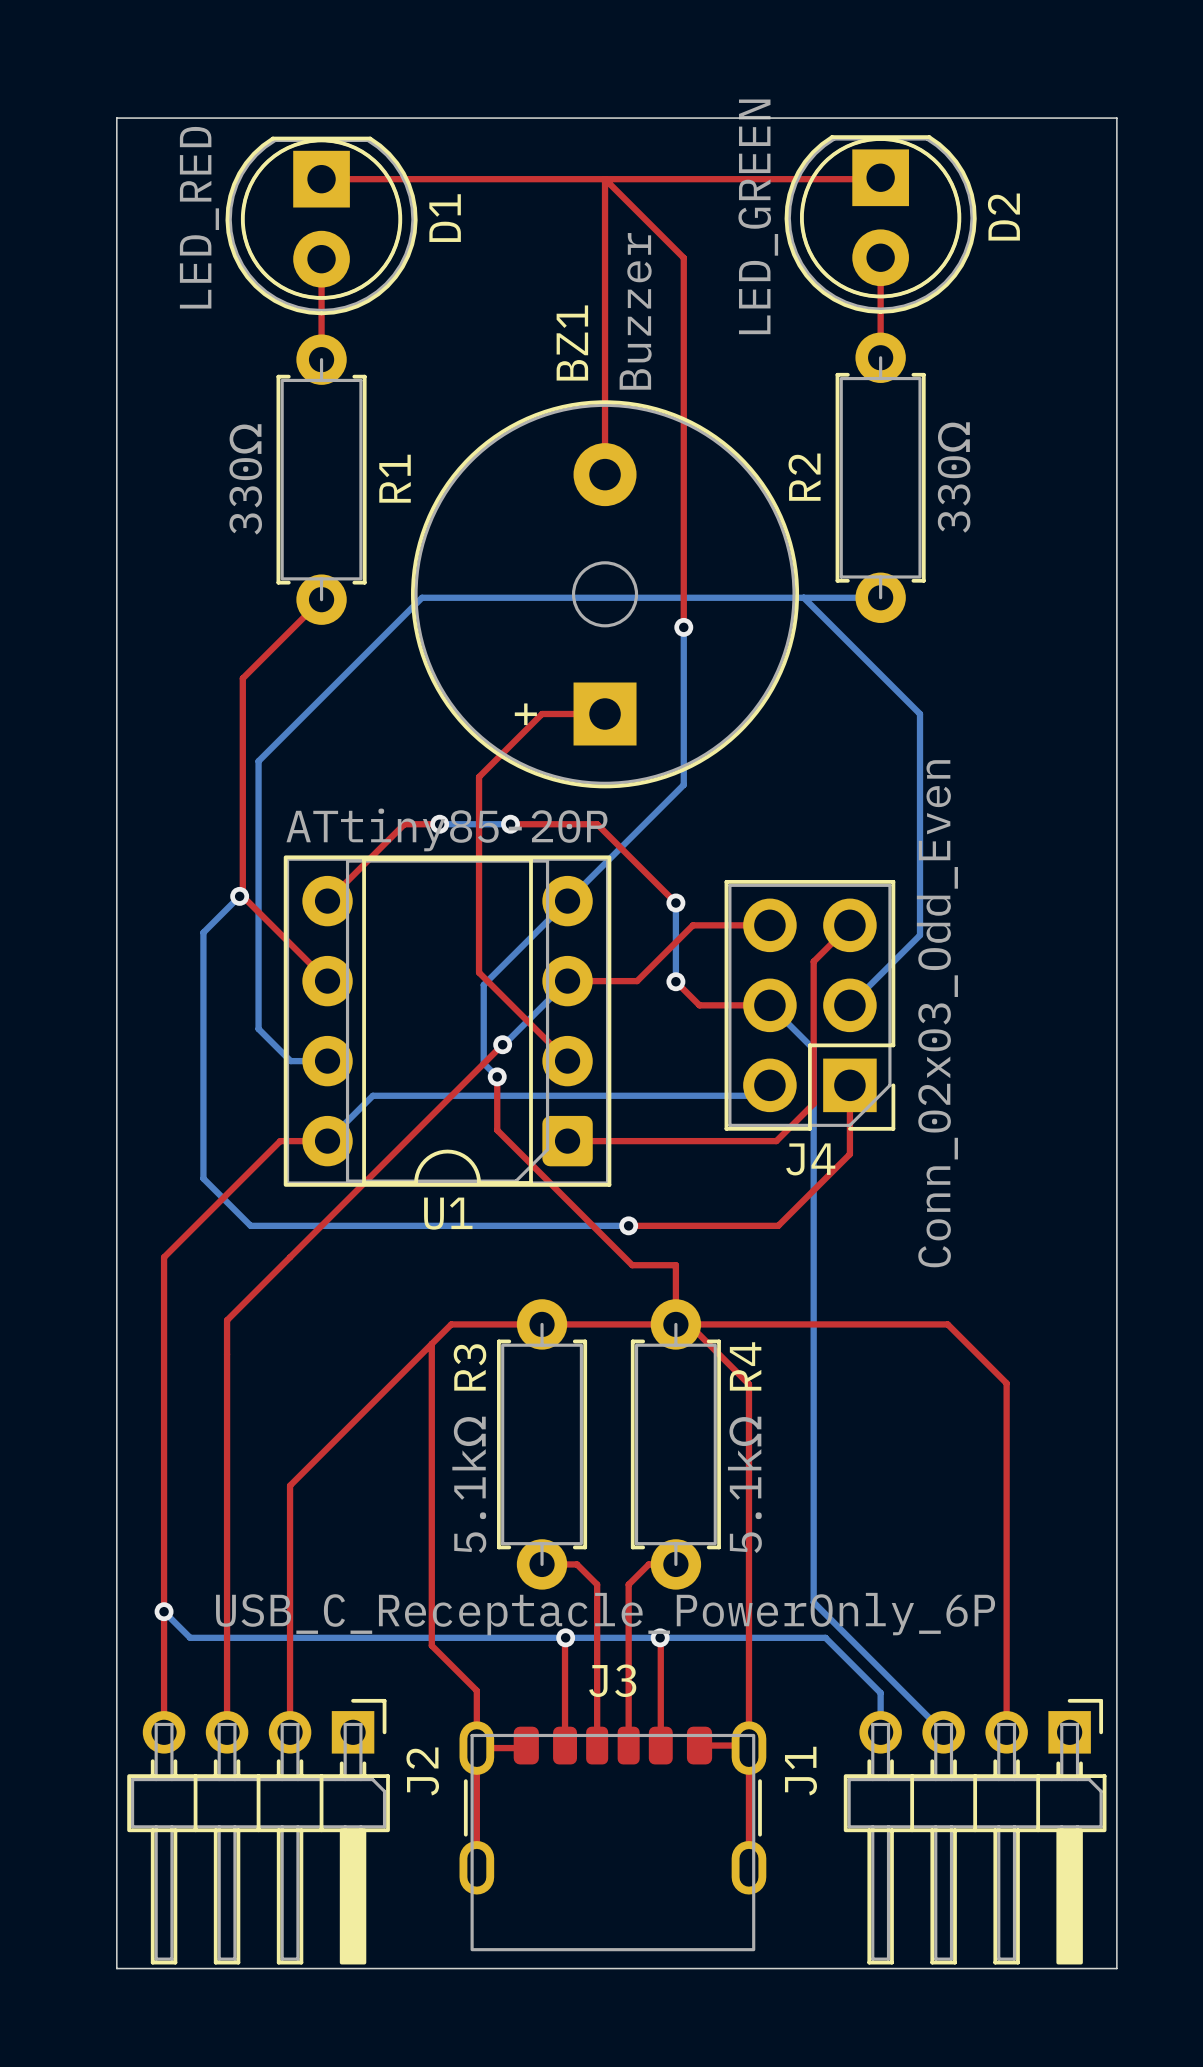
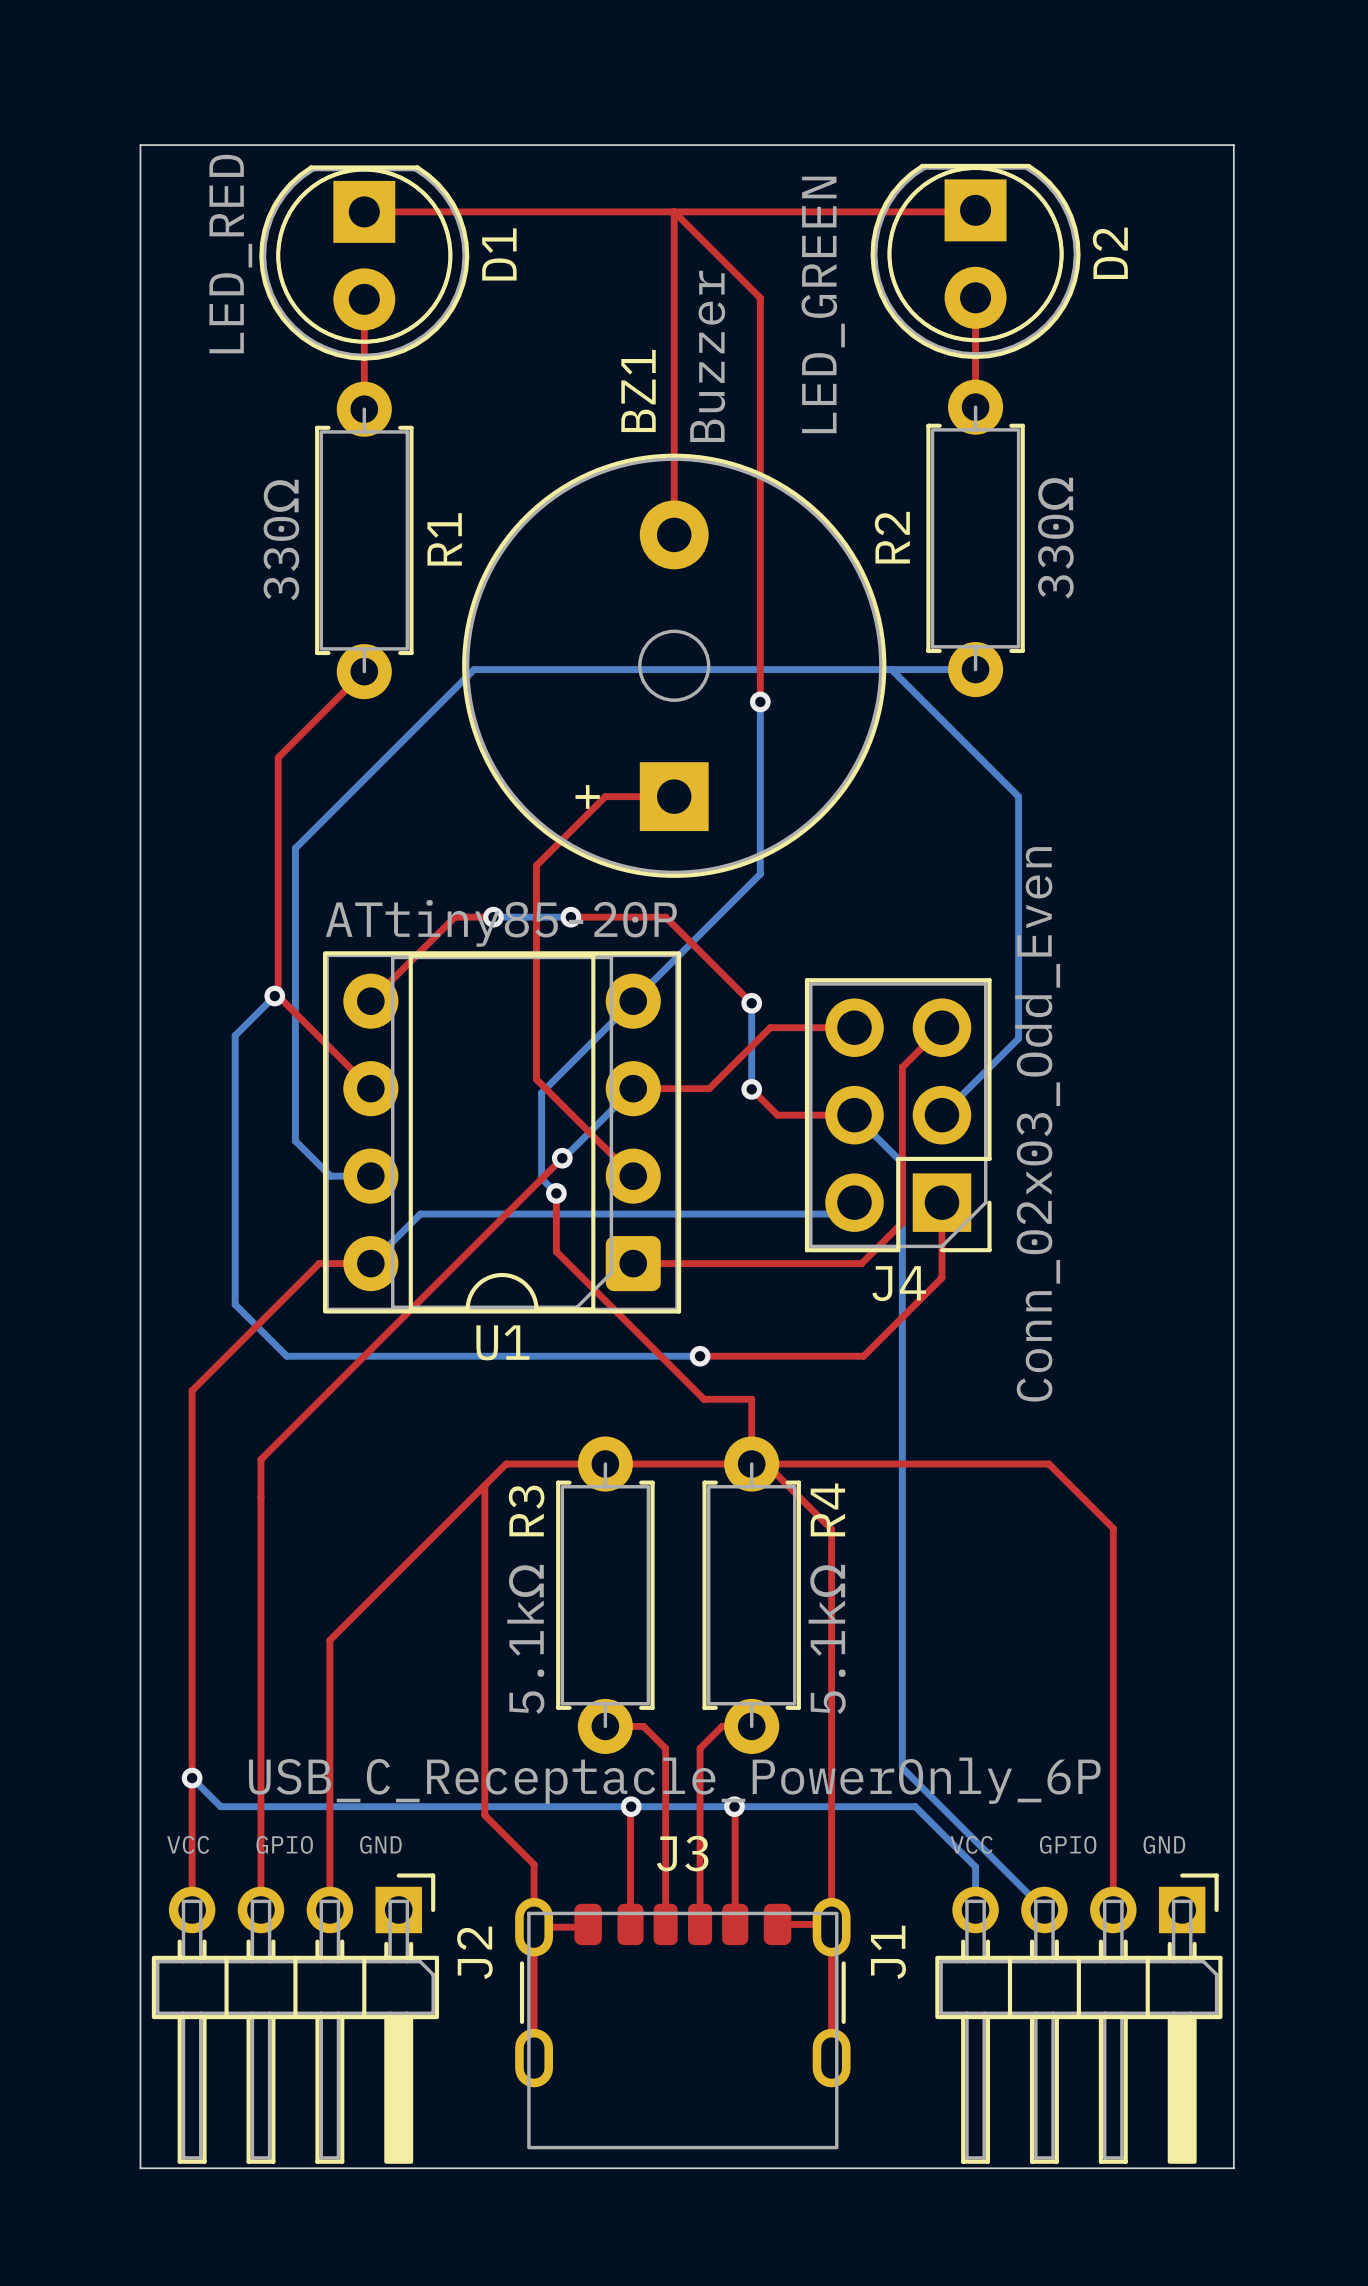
D2 value position: LED_GREEN (758, 216) -> LED_GREEN (823, 304)
text: none -> VCC GPIO GND (284, 1844)
text: none -> VCC GPIO GND (1067, 1844)

